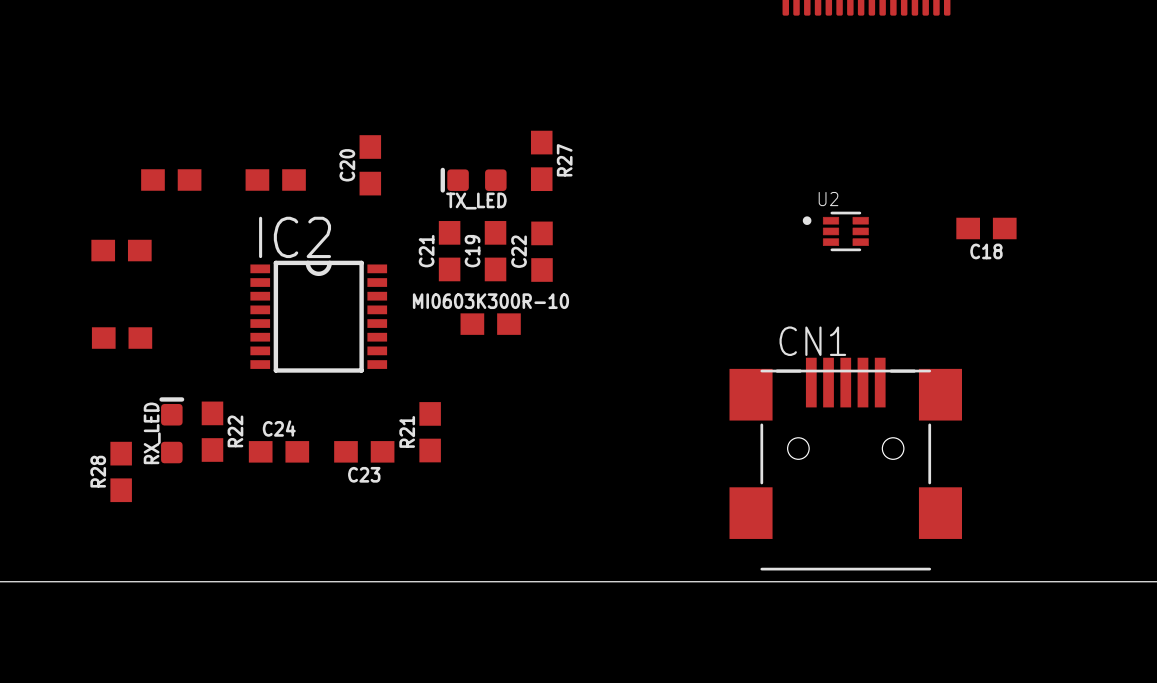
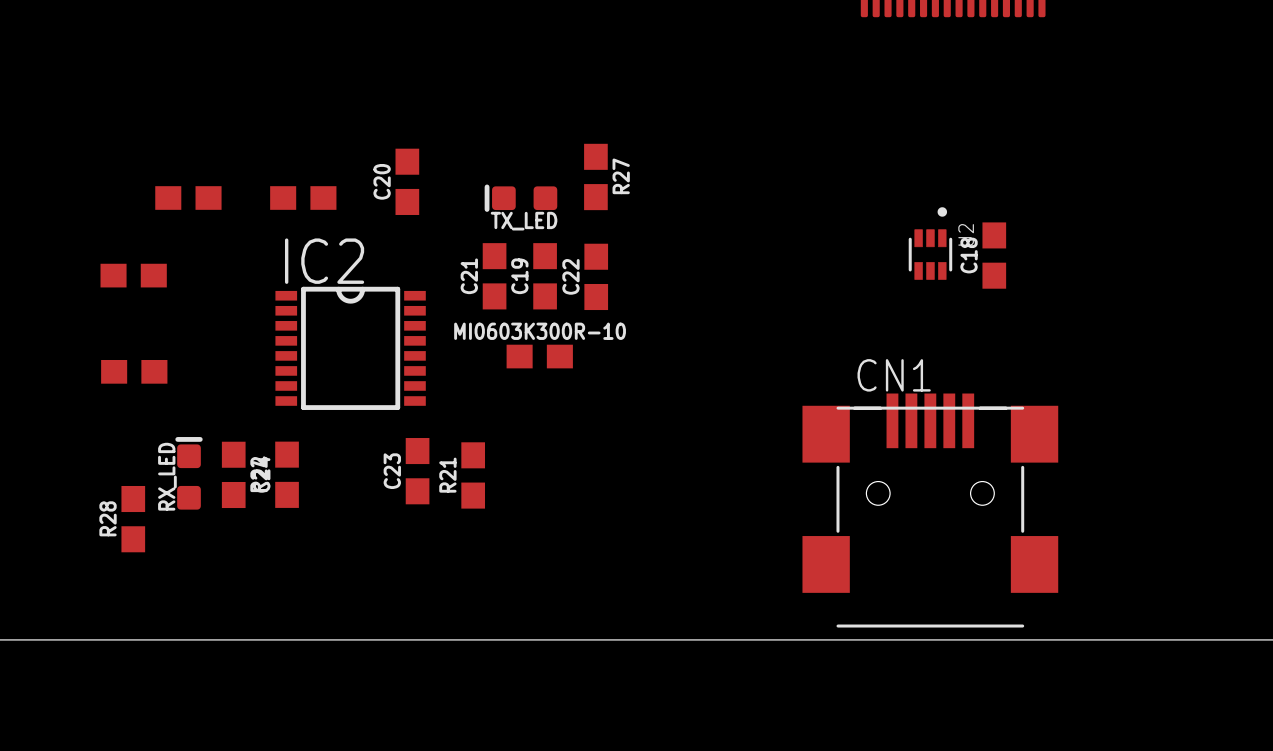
C18 rotation: 0° (986, 228) -> 90° clockwise (994, 255)
C18 position: (986, 228) -> (994, 255)
U2 rotation: 0° (835, 231) -> 90° clockwise (930, 243)
C24 rotation: 0° (278, 451) -> 90° clockwise (287, 474)
C23 rotation: 0° (364, 451) -> 90° clockwise (417, 471)

